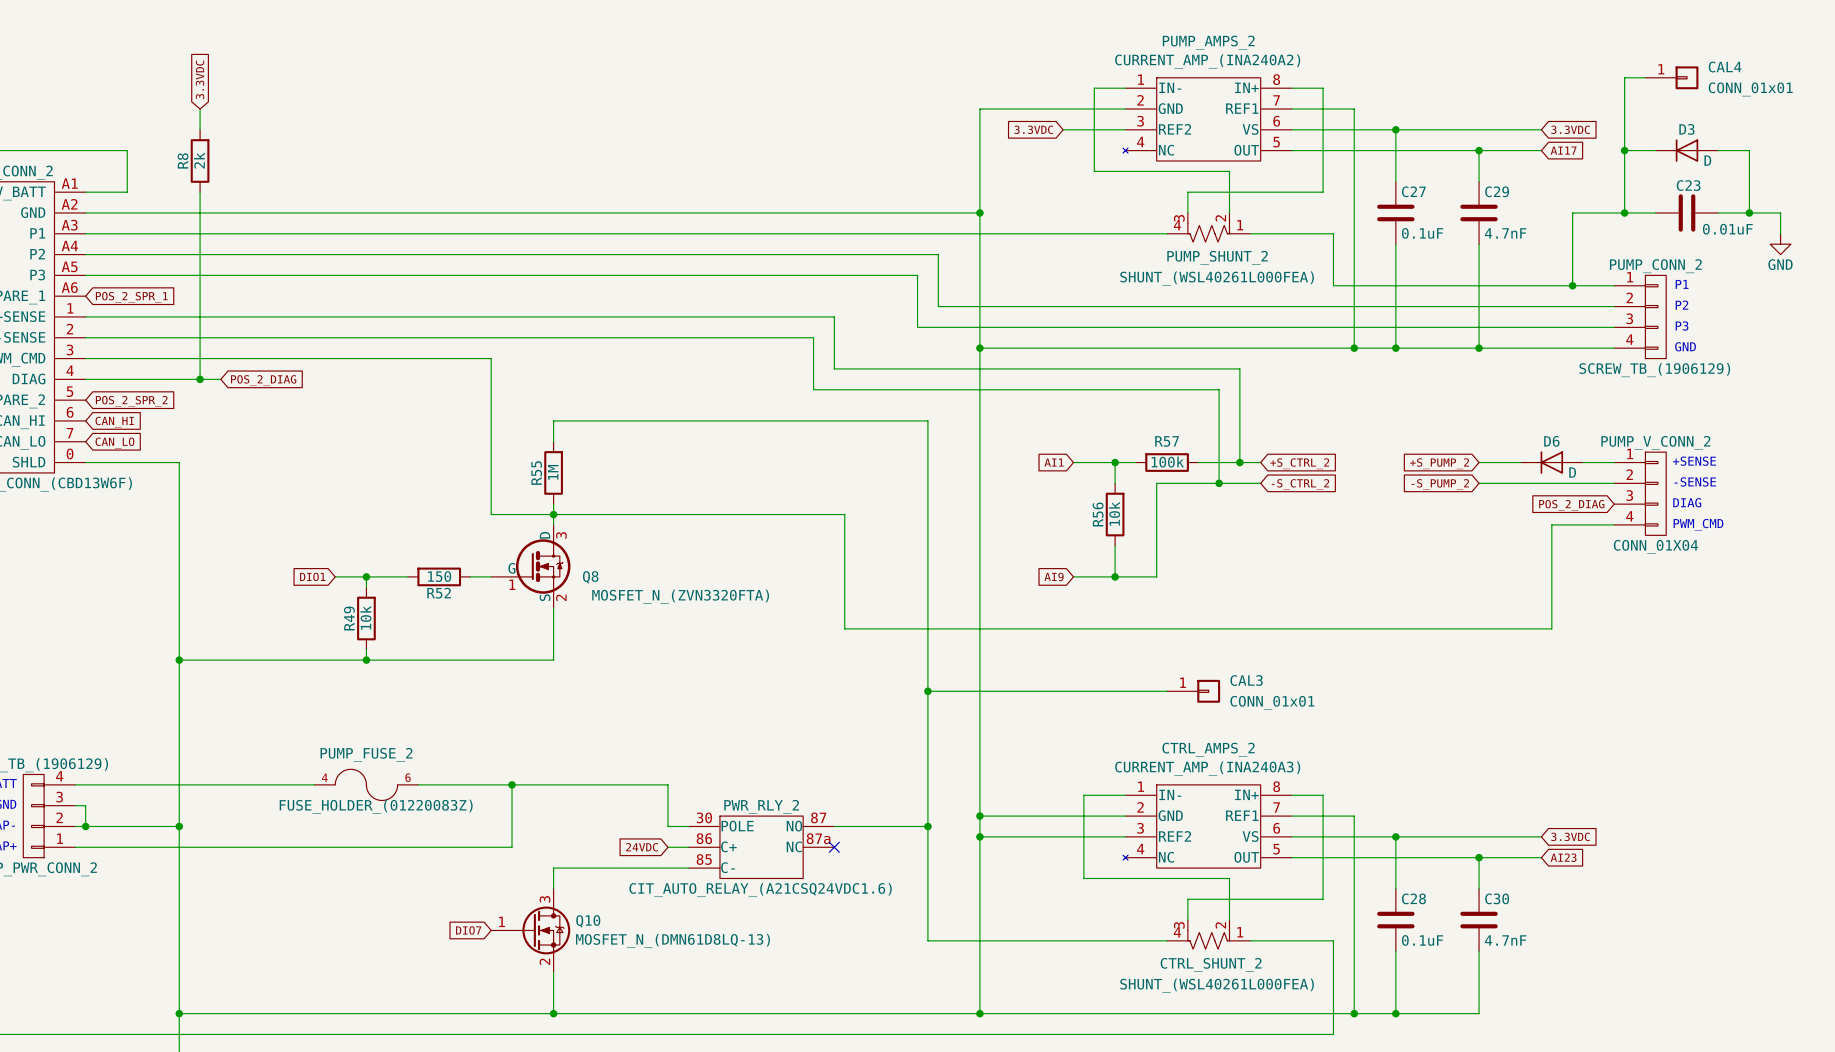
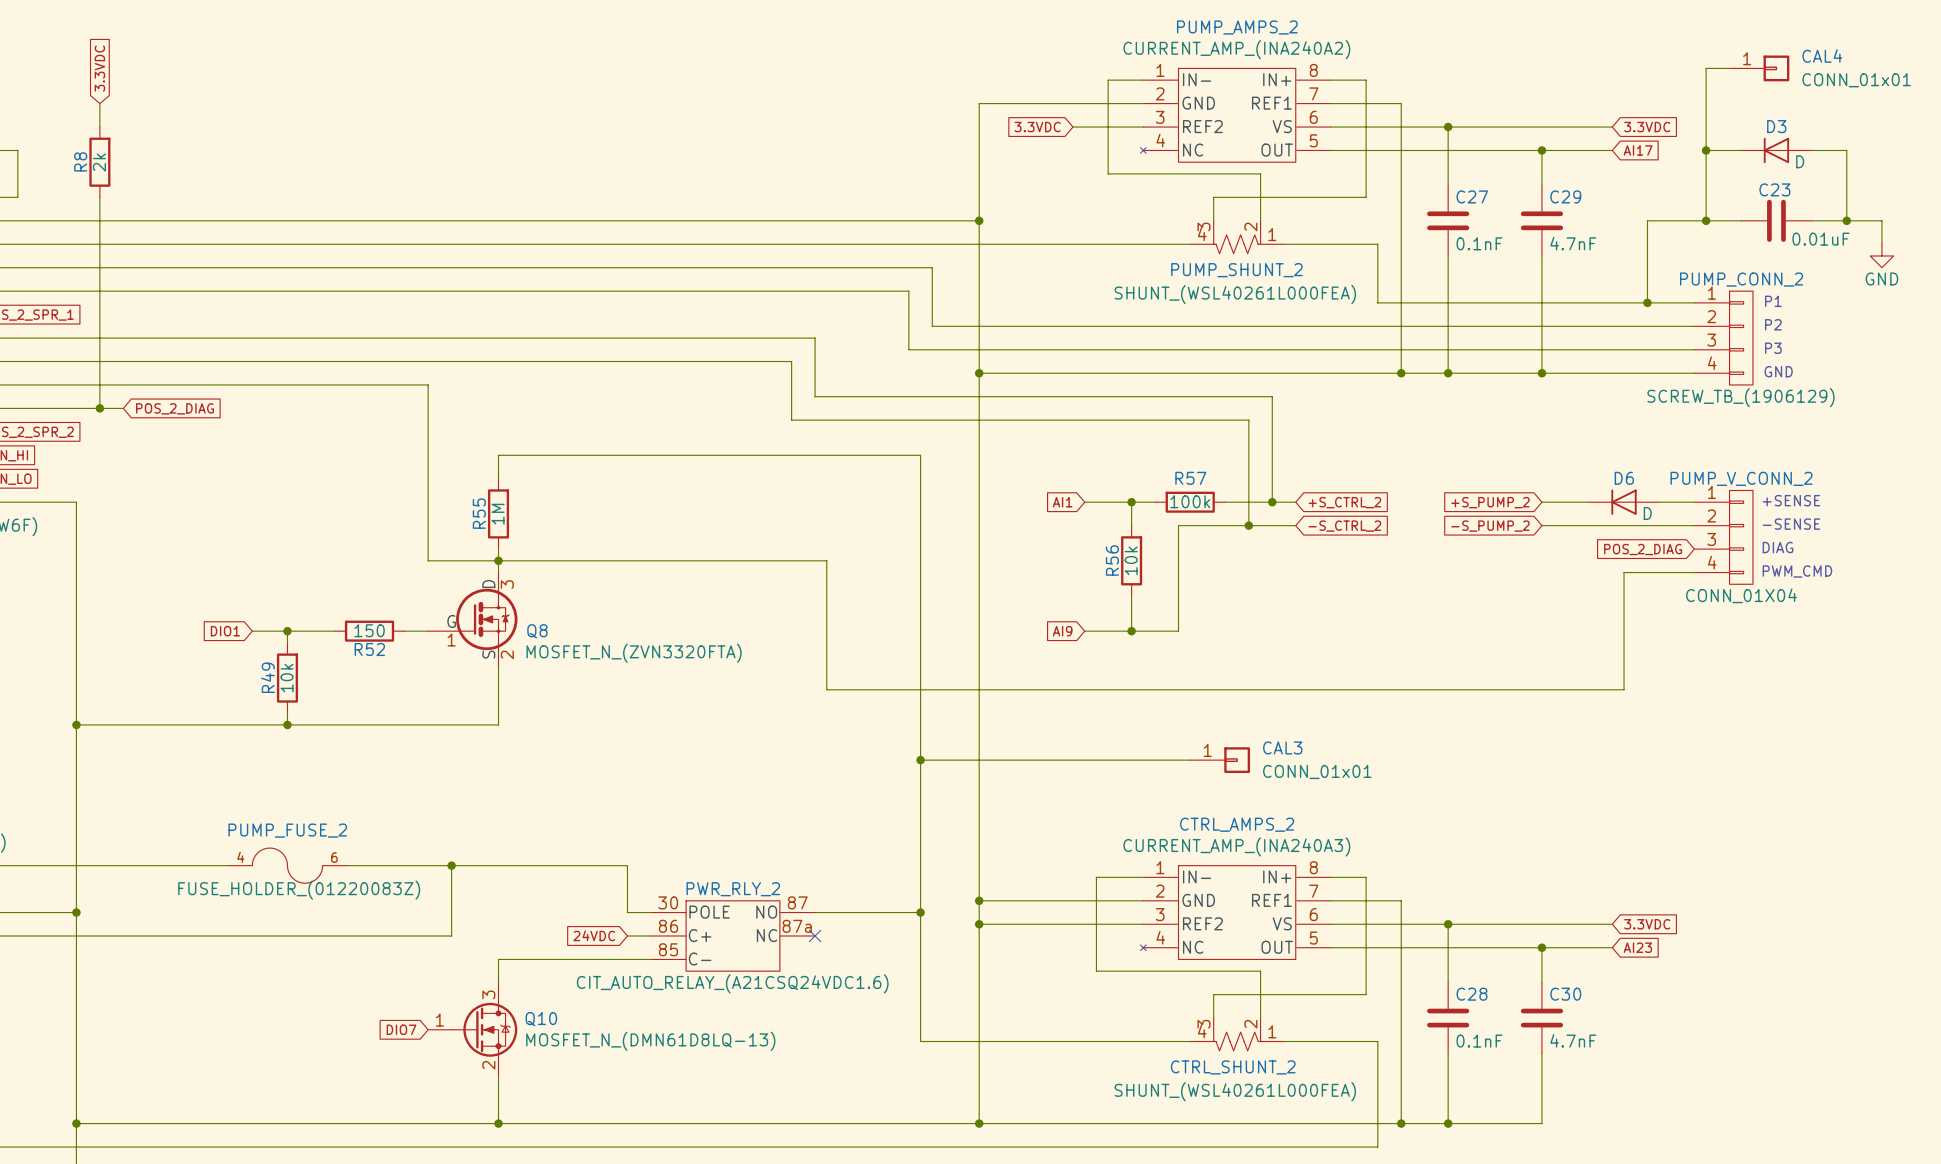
C27 value: 0.1uF (1422, 233) -> 0.1nF (1479, 243)
C28 value: 0.1uF (1422, 940) -> 0.1nF (1479, 1041)

